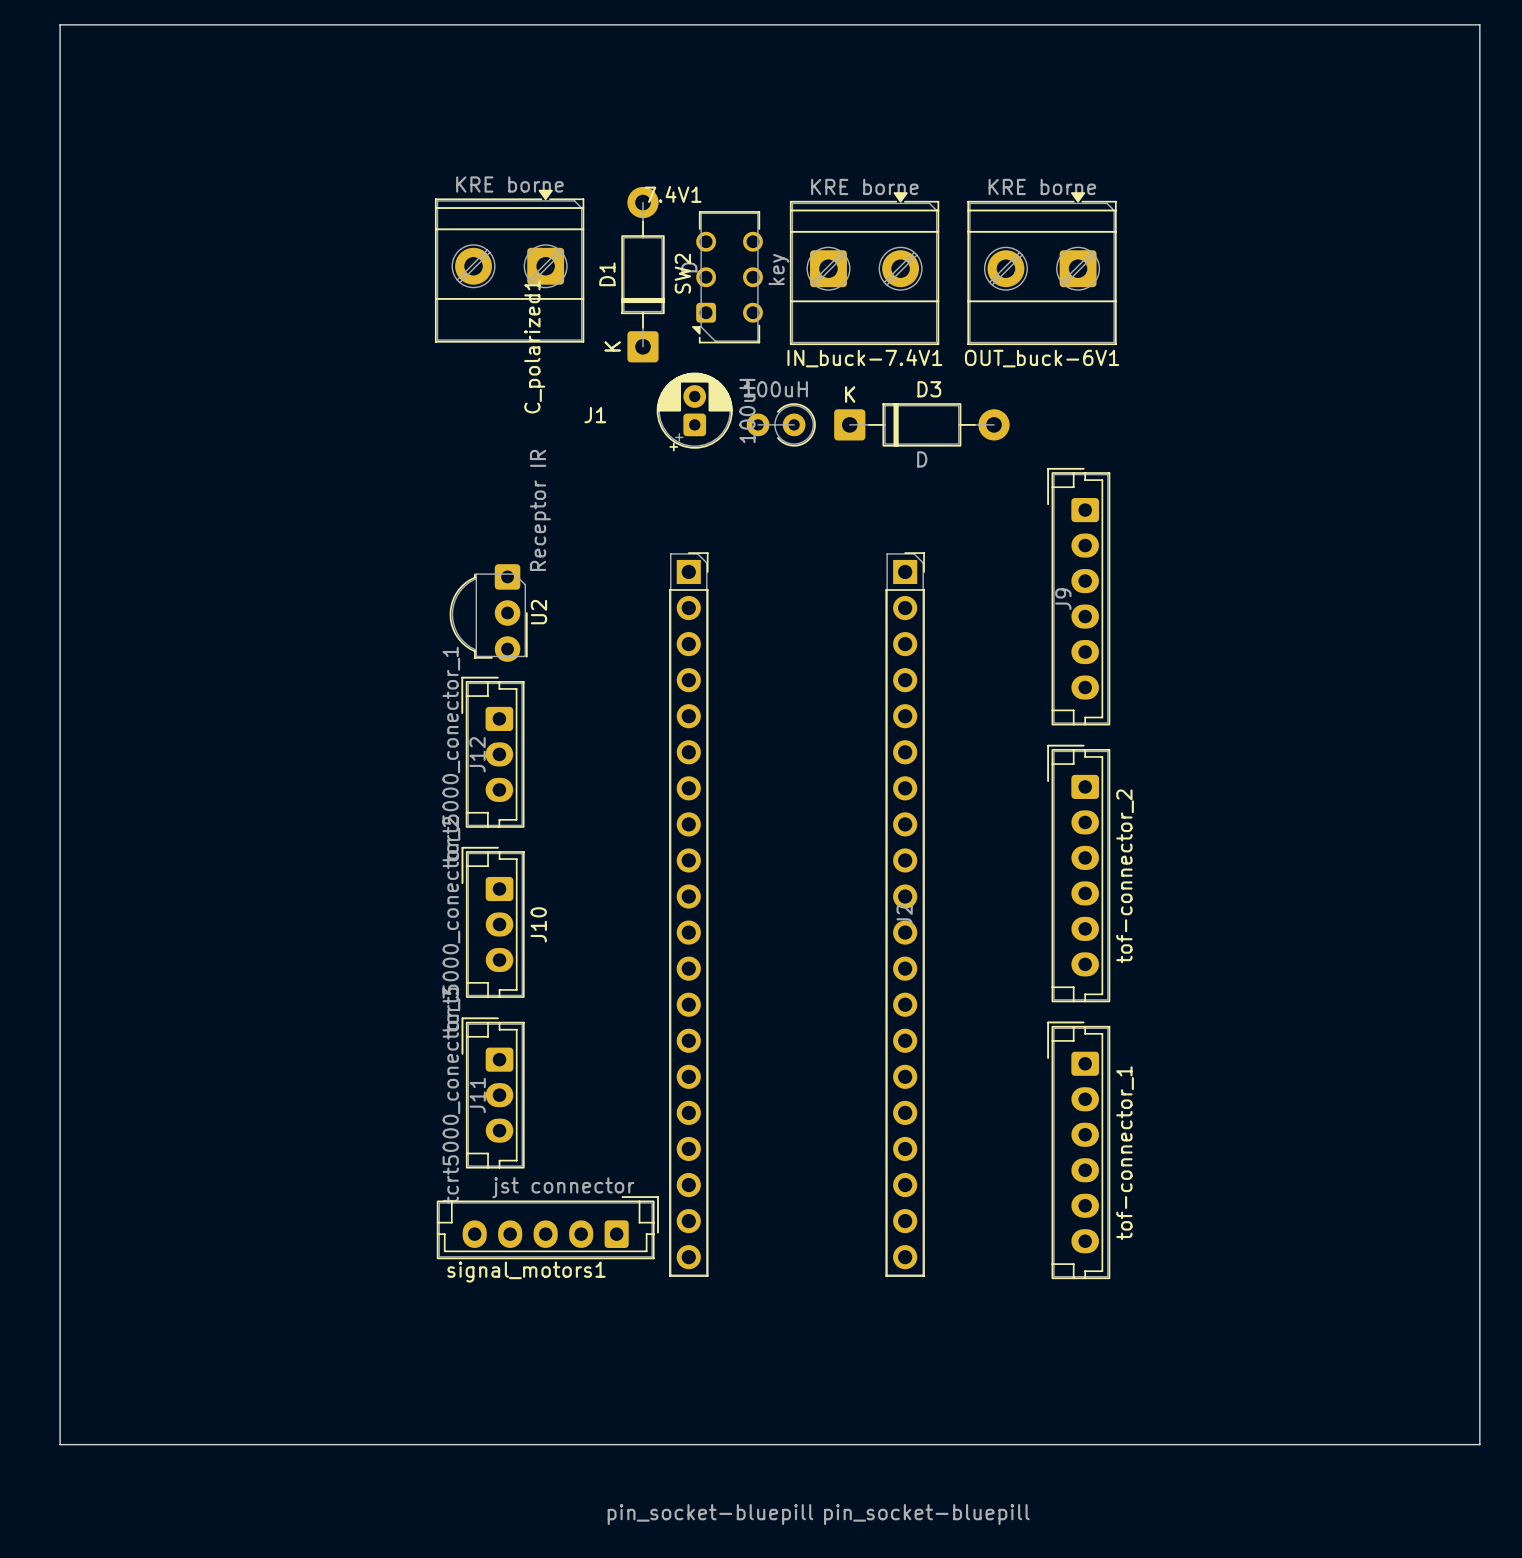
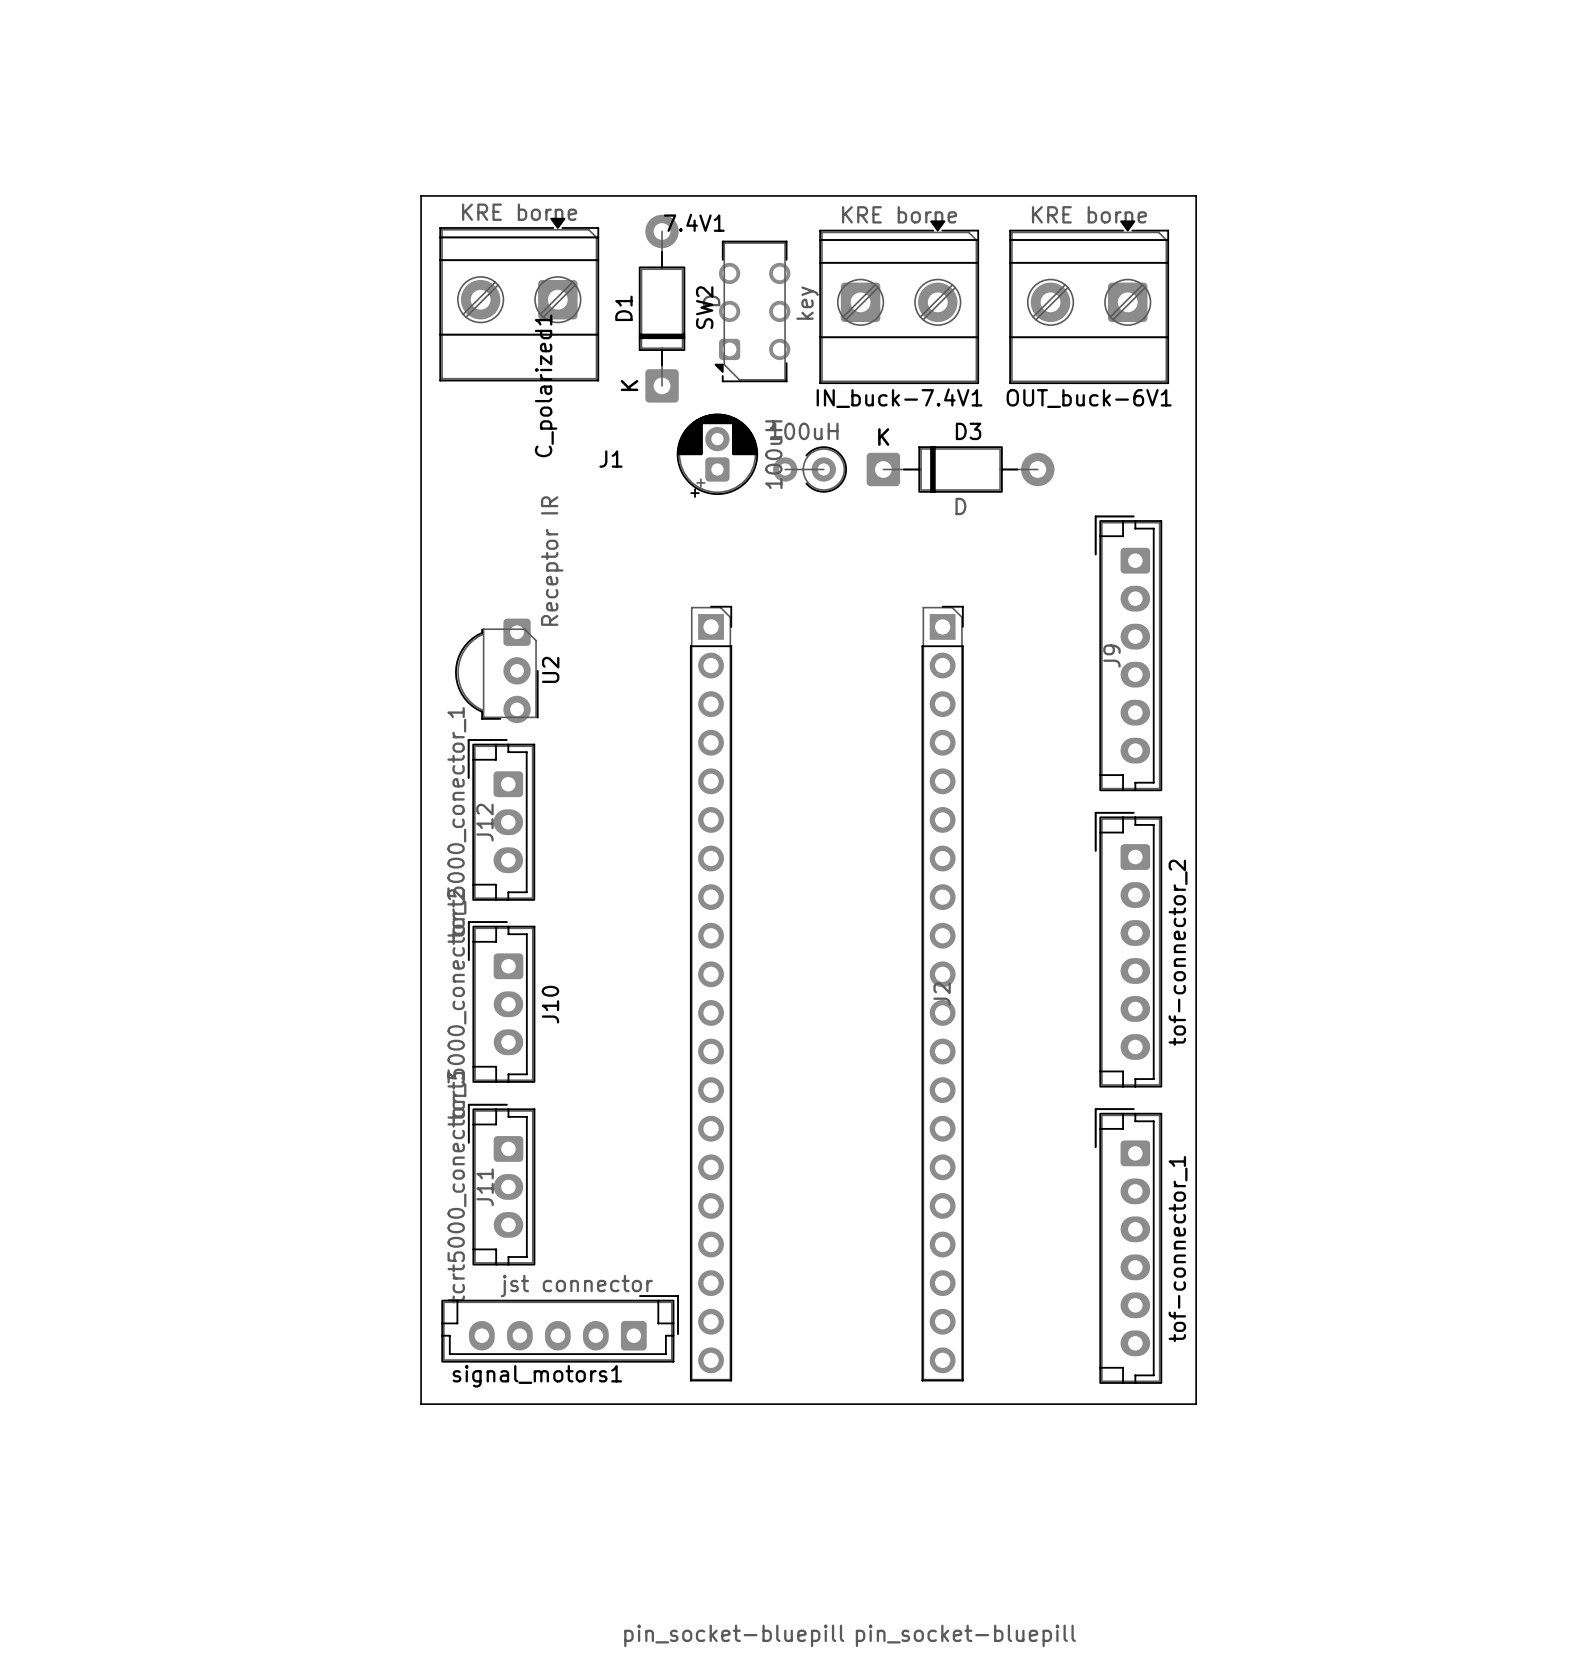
board edge: (60, 24) (1479, 24) (1479, 1444) (60, 1444) (60, 24) -> none
board edge: none -> (421, 195) (1196, 195) (1196, 1404) (421, 1404) (421, 195)

